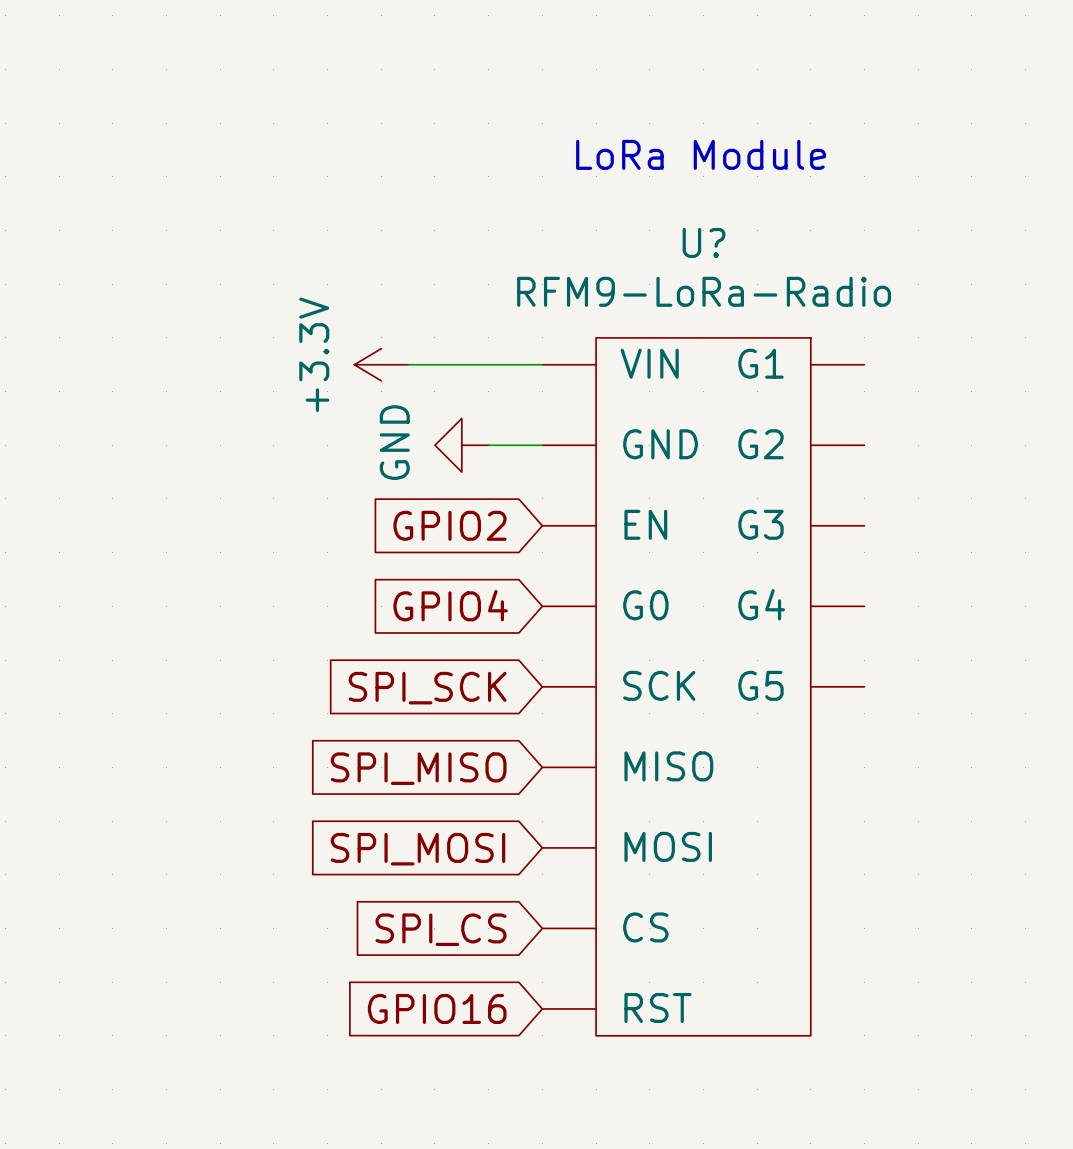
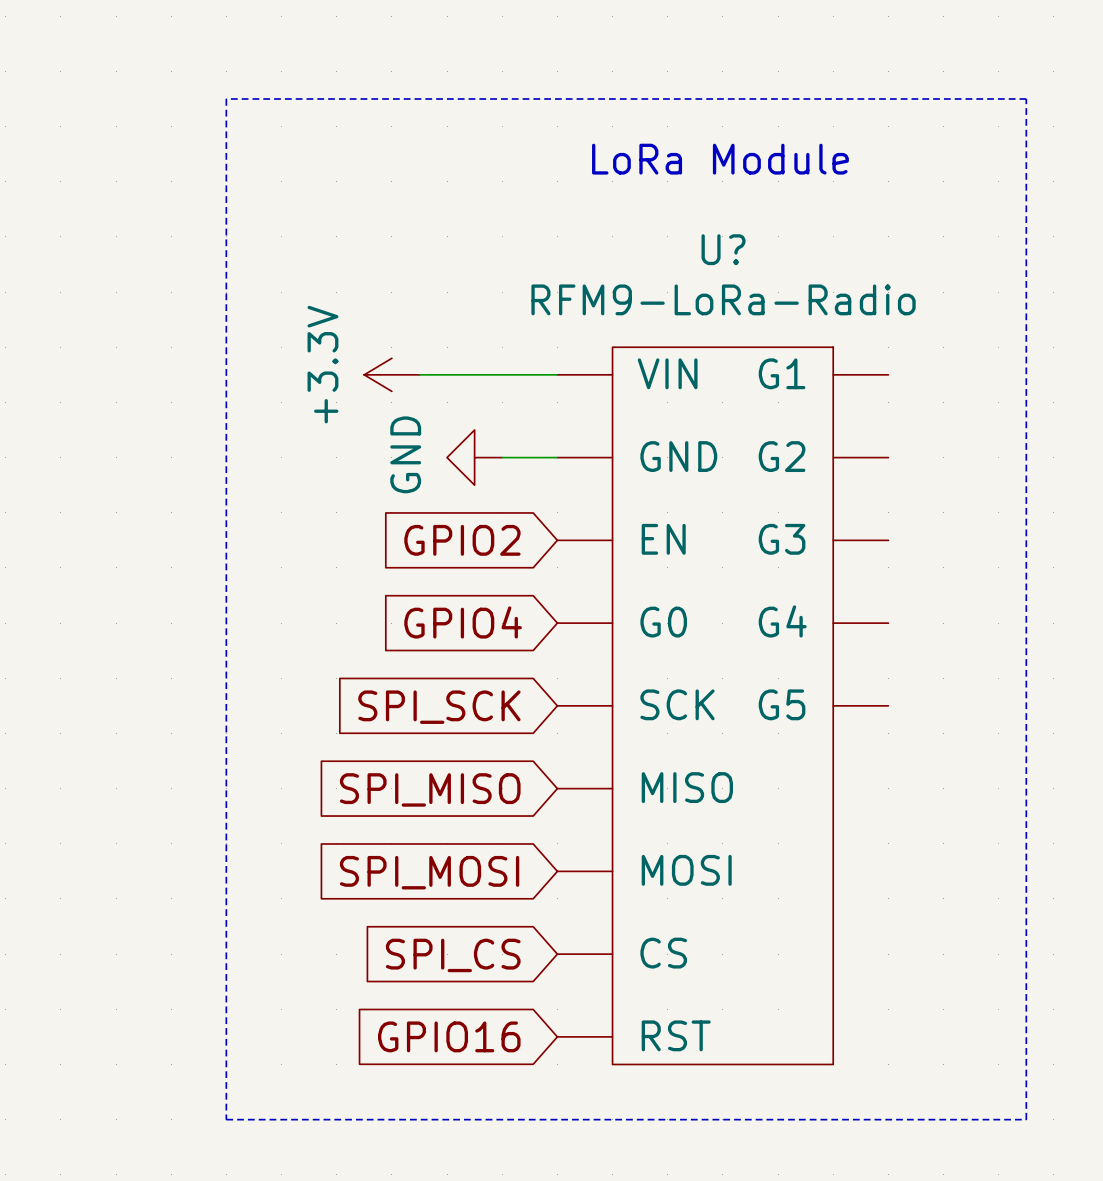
line: none -> (226, 98) (1026, 98) (1026, 1119) (226, 1119) (226, 98)

